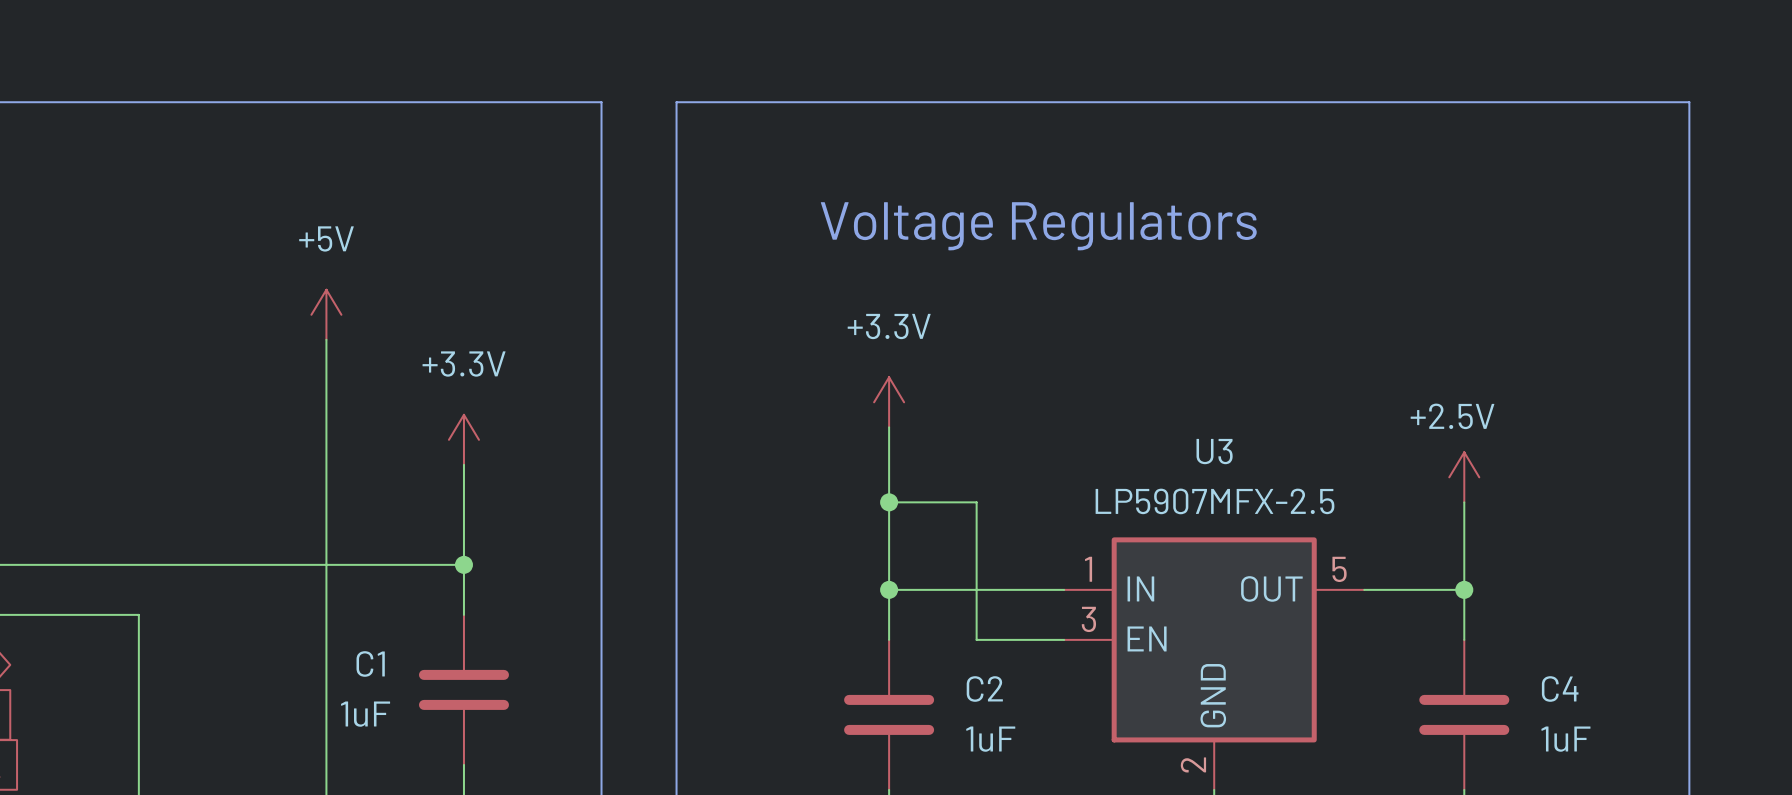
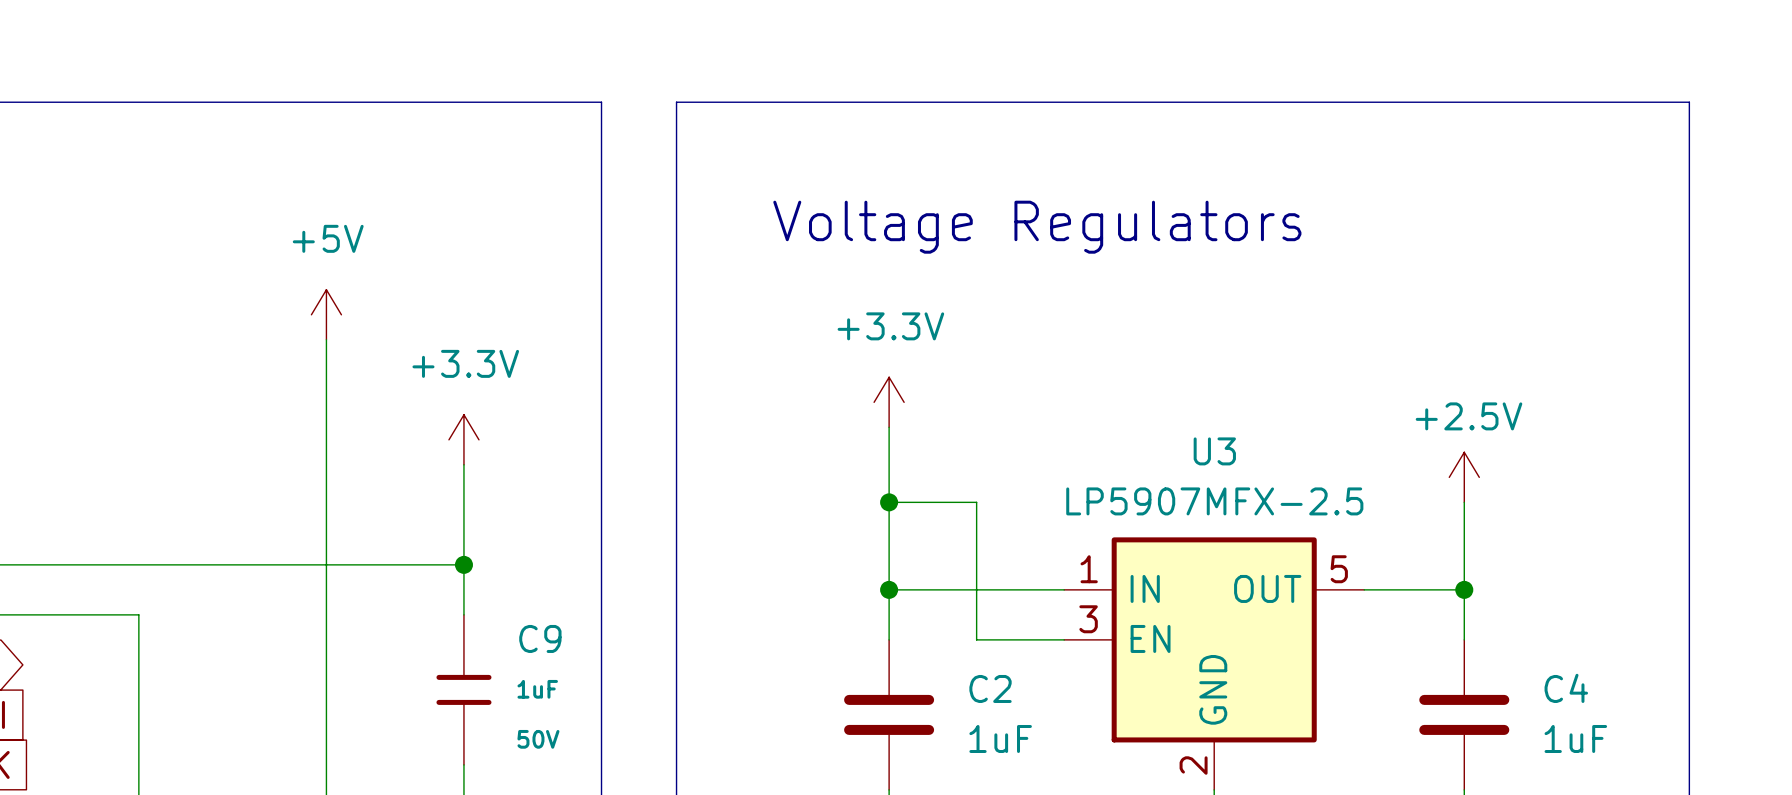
C1: 1uF (463, 689) -> none
C9: none -> 1uF (463, 689)

